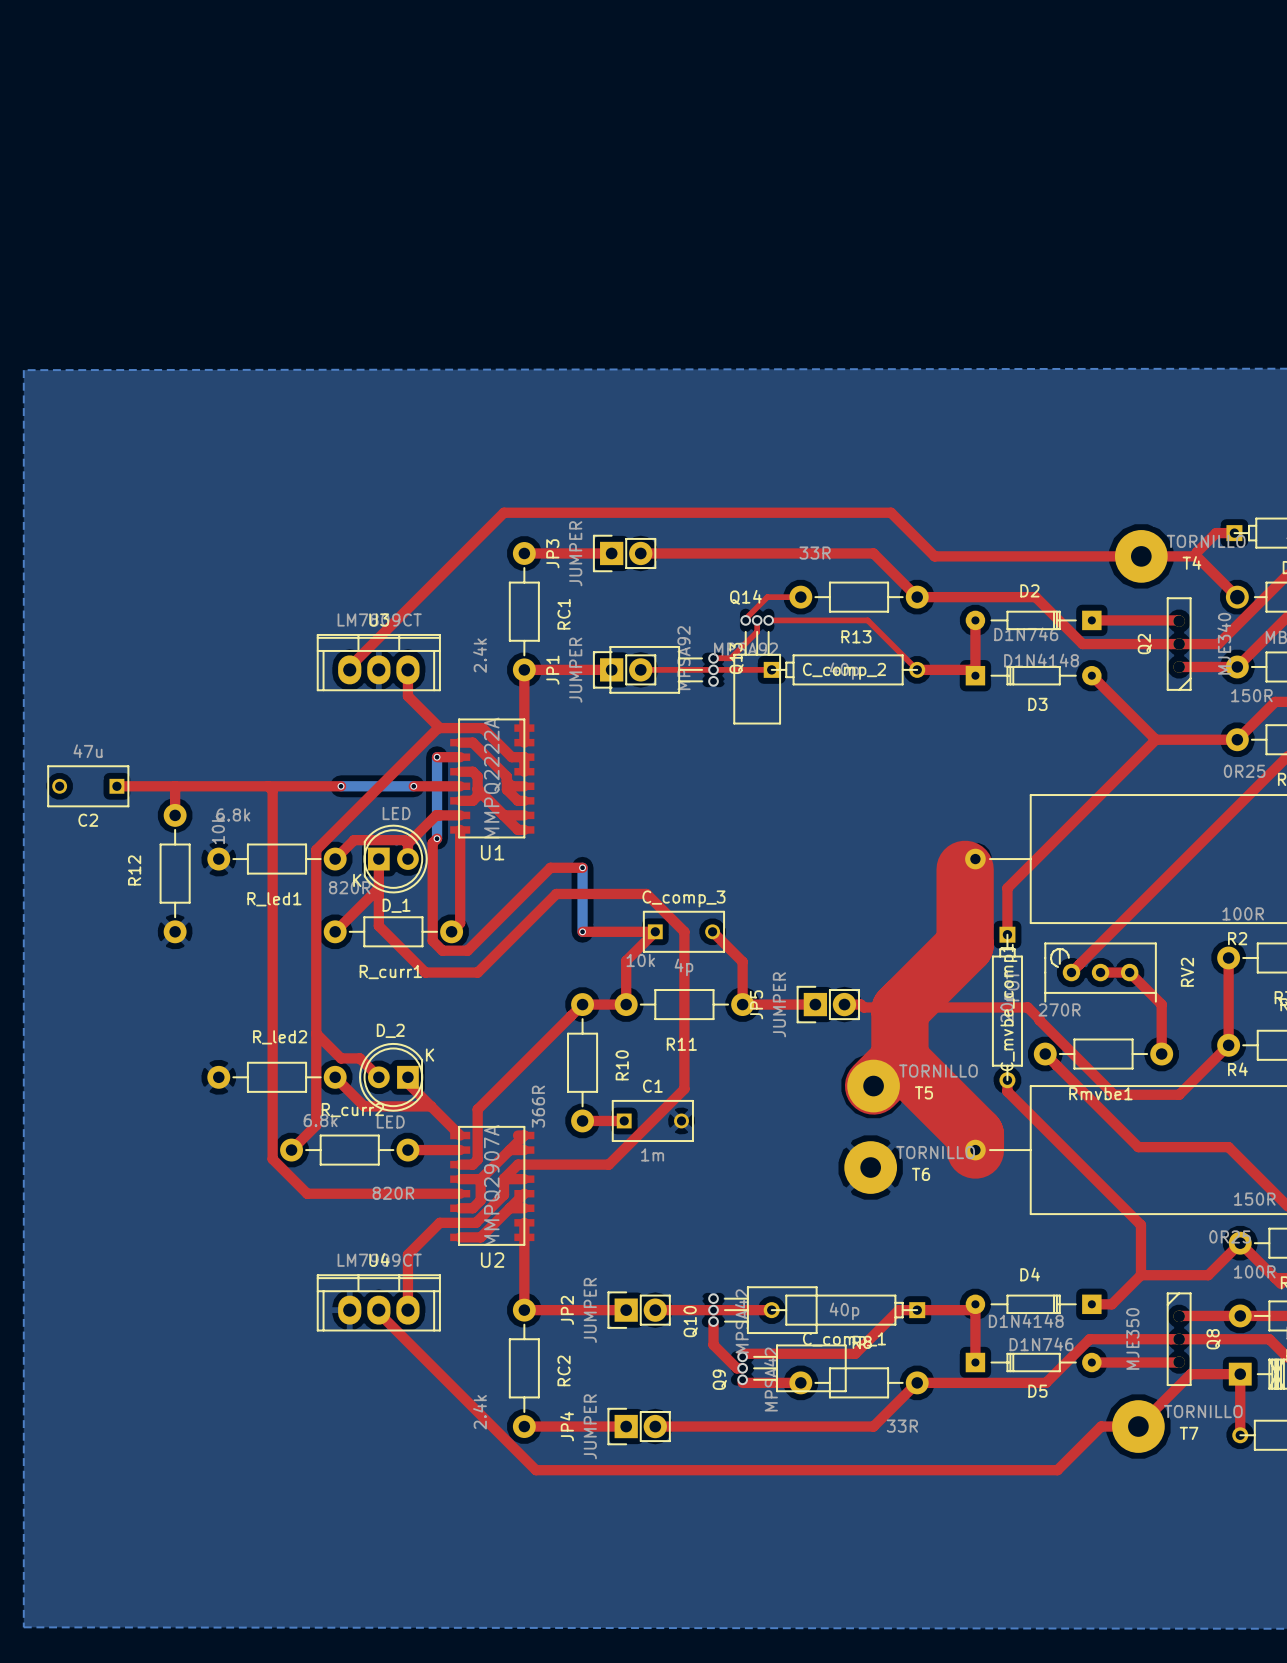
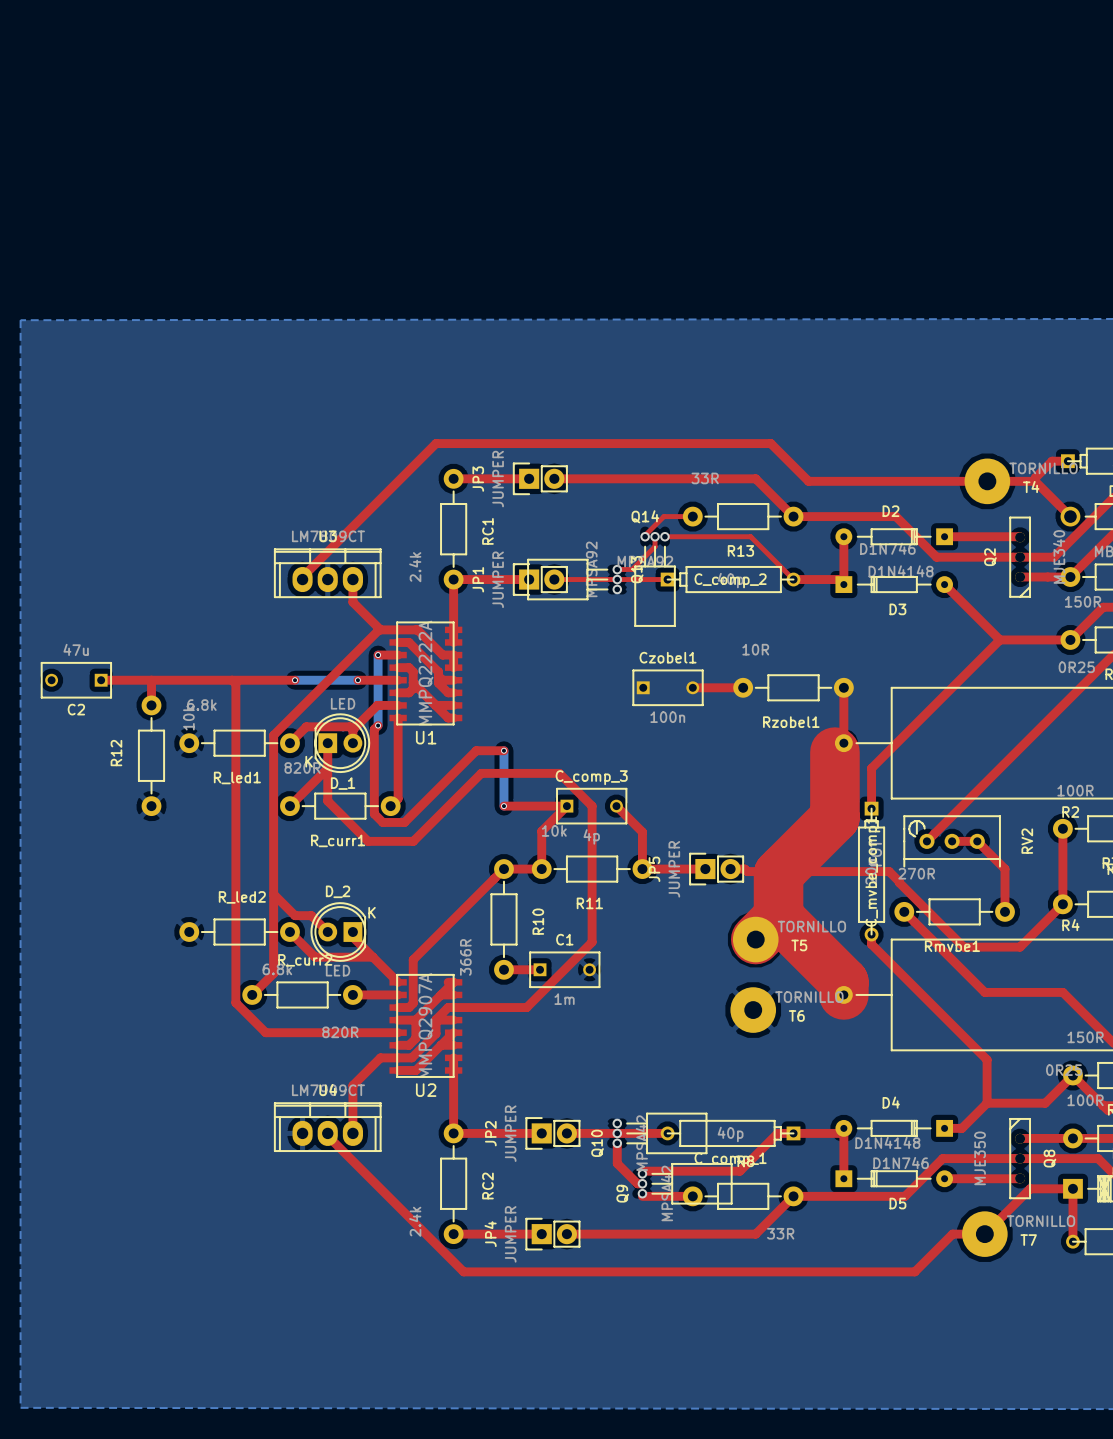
Czobel1: none -> 100n (668, 687)
top track: none -> (692, 687) (743, 687)
Rzobel1: none -> 10R (793, 687)
top track: none -> (843, 687) (843, 743)

